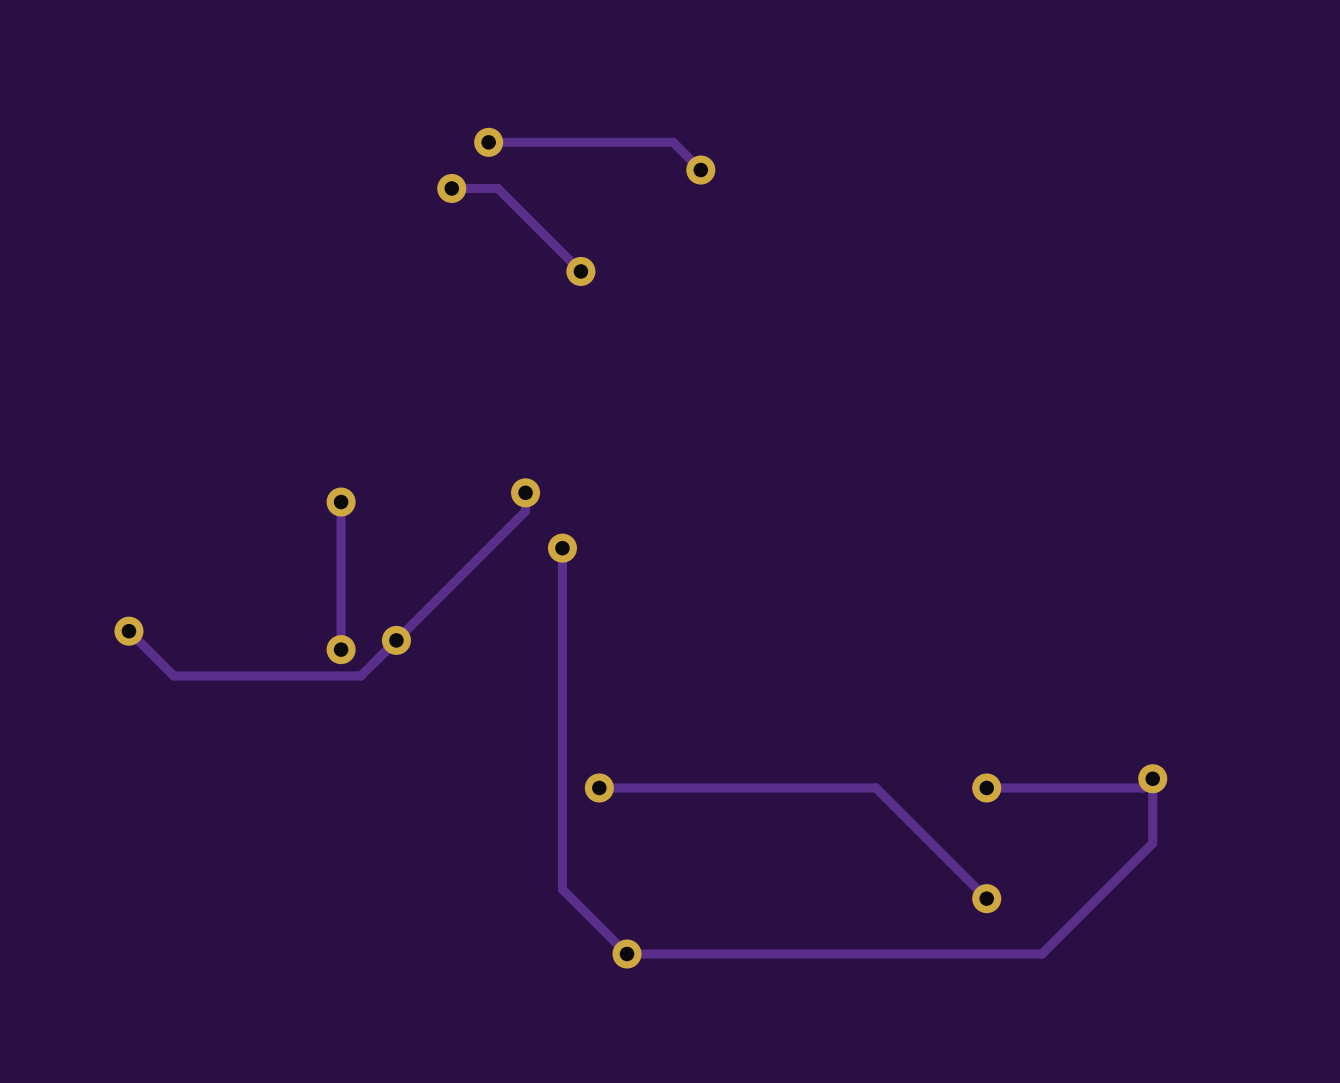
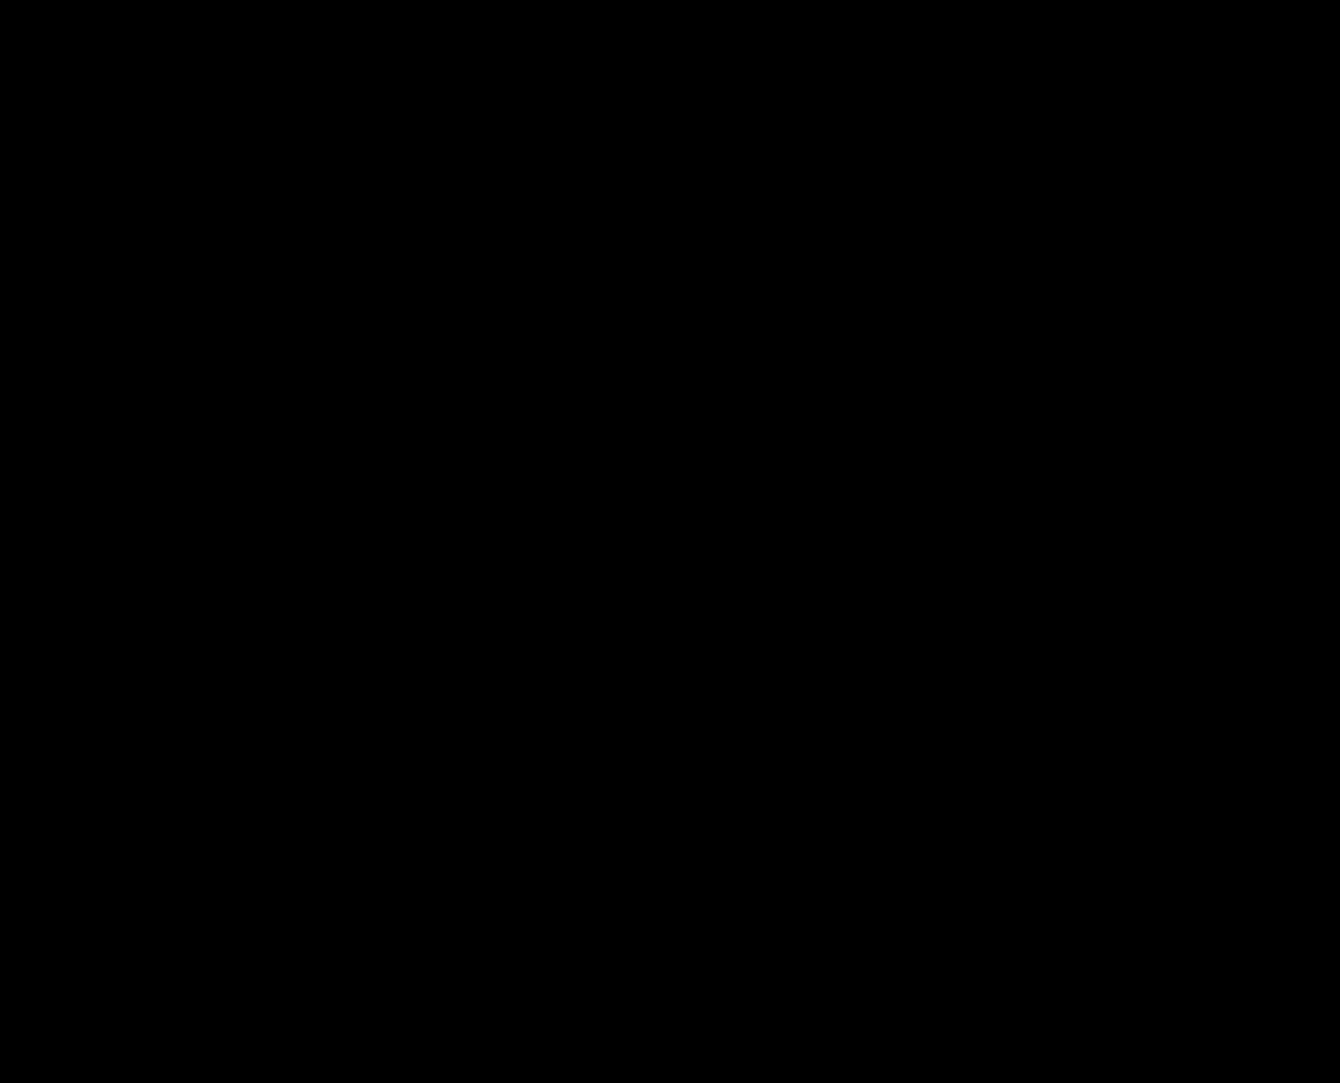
track: (488, 142) (673, 142) (700, 170) -> none
via: (488, 142) -> none
via: (700, 170) -> none
track: (451, 188) (497, 188) (580, 271) -> none
via: (451, 188) -> none
via: (580, 271) -> none
track: (525, 492) (525, 511) (360, 675) (173, 675) (128, 631) -> none
via: (525, 492) -> none
track: (341, 502) (341, 649) -> none
via: (341, 502) -> none
track: (562, 548) (562, 889) (627, 953) (1042, 953) (1152, 843) (1152, 778) (1143, 787) (986, 787) -> none
via: (562, 548) -> none
via: (128, 631) -> none
via: (396, 640) -> none
via: (341, 649) -> none
via: (1152, 778) -> none
track: (599, 787) (876, 787) (986, 898) -> none
via: (599, 787) -> none
via: (986, 787) -> none
via: (986, 898) -> none
via: (627, 953) -> none

